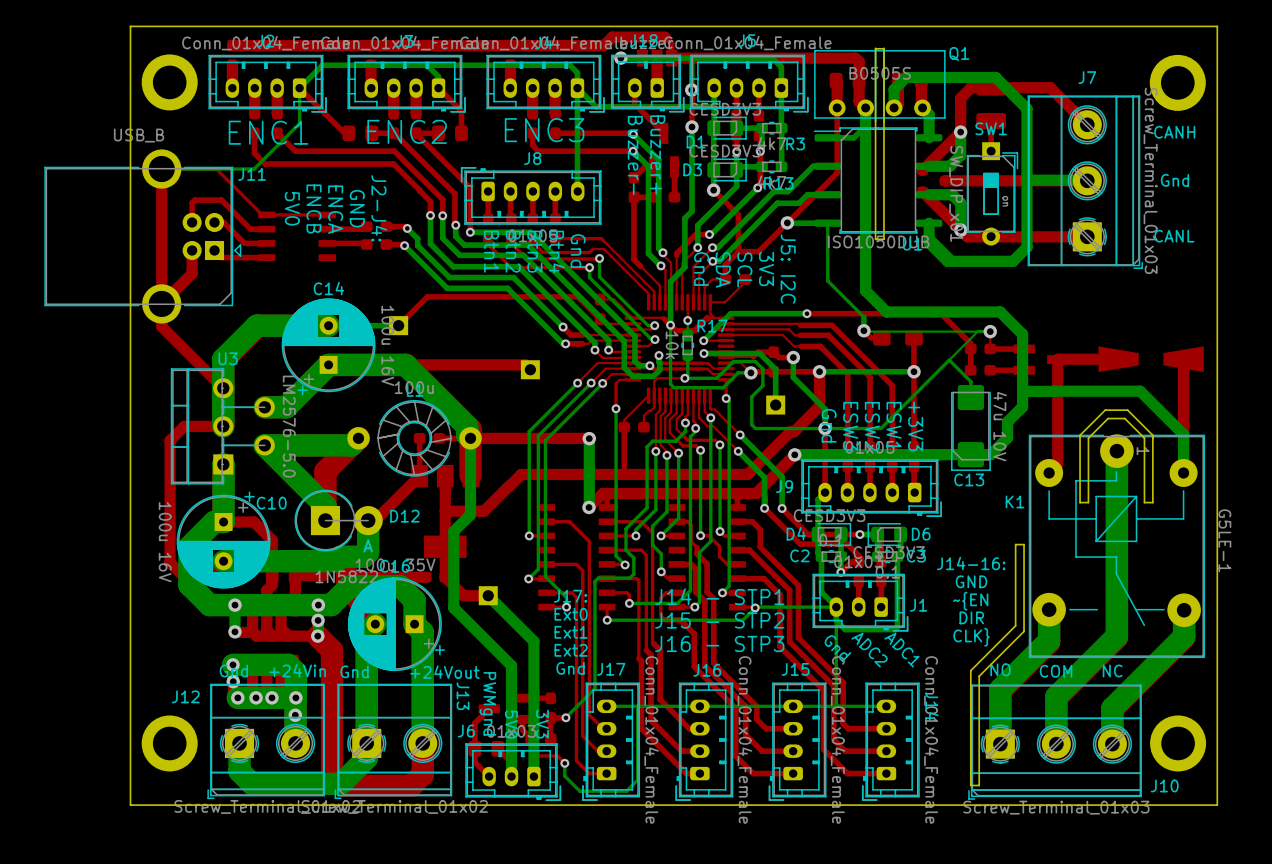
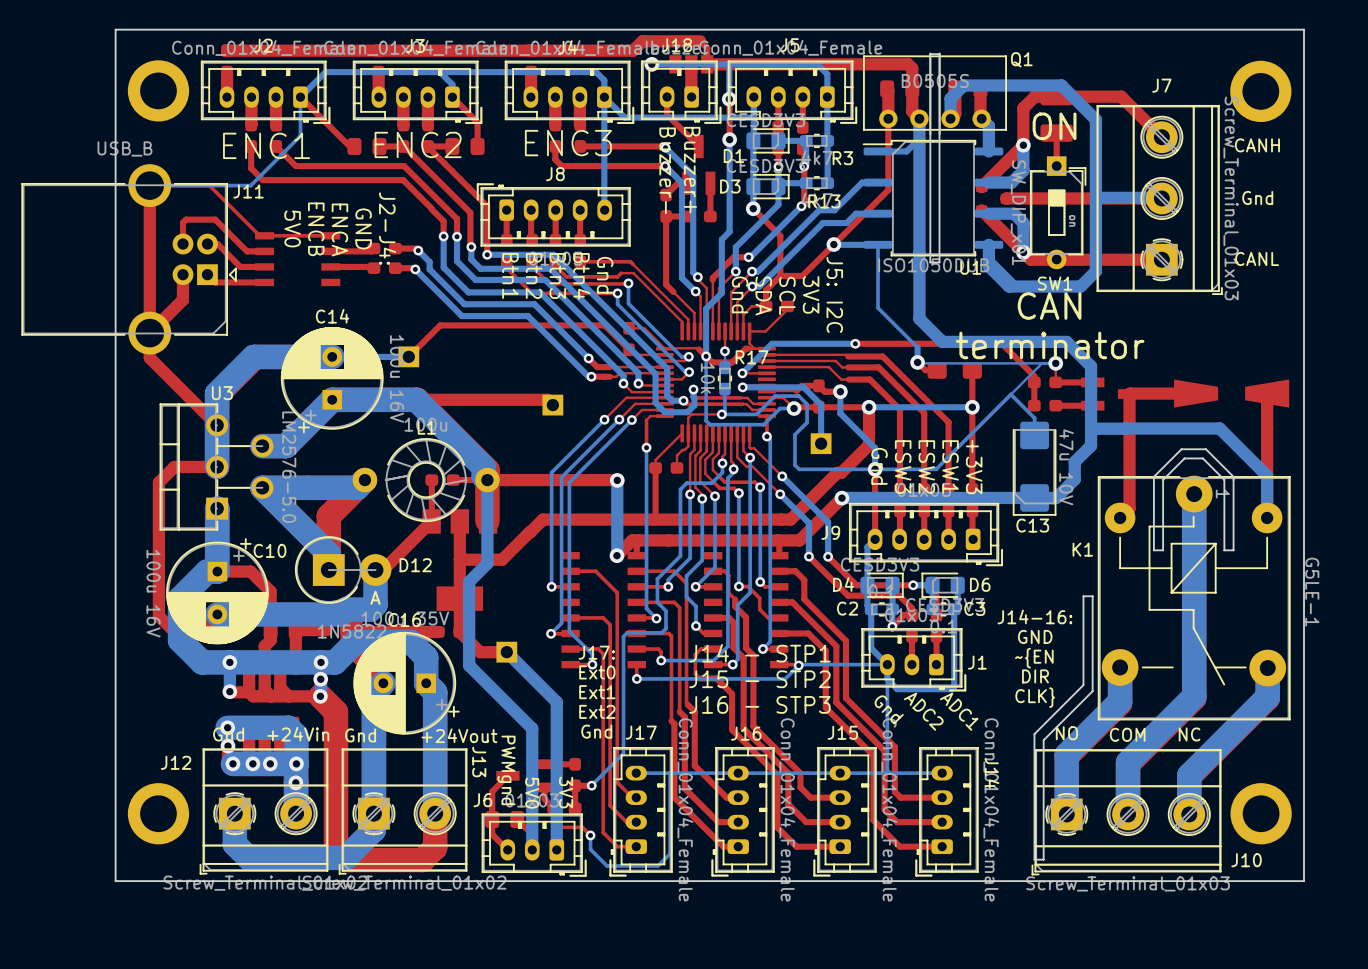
text: none -> ON (1054, 126)
SW1 name position: SW1 (991, 128) -> SW1 (1055, 283)
text: none -> CAN (1049, 306)
text: none -> terminator (1050, 345)

